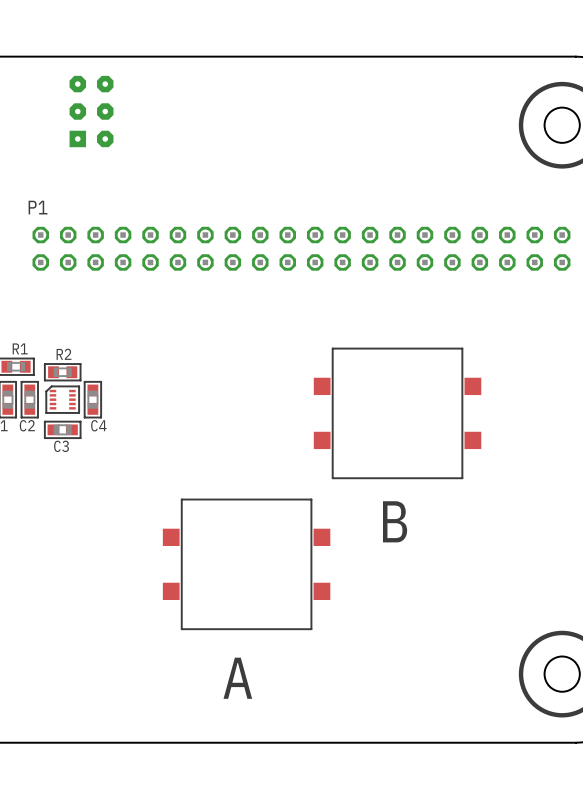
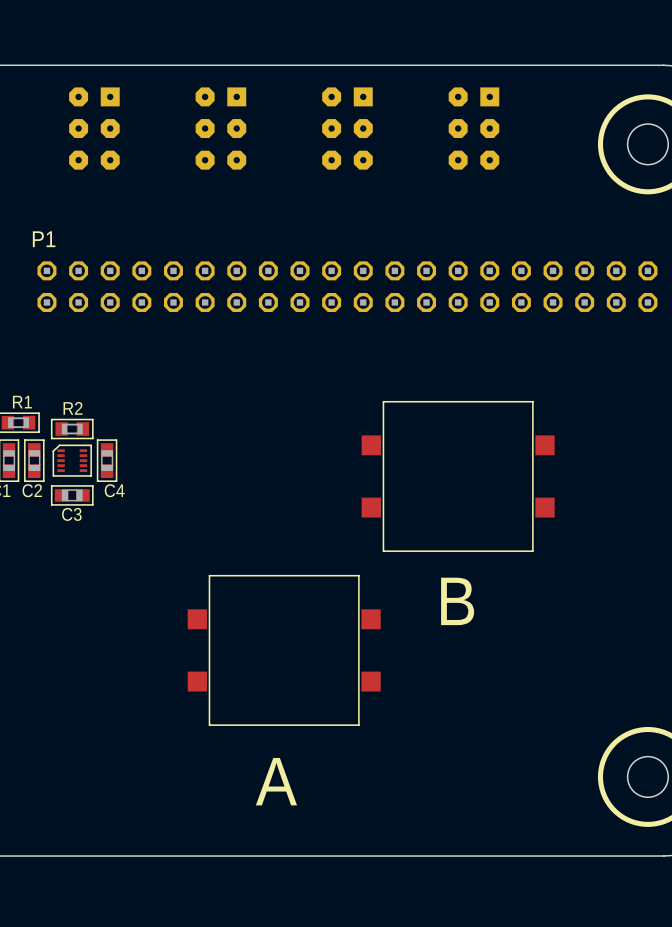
part rotation: 0° (91, 111) -> 180° (94, 128)
part: none -> (220, 128)
part: none -> (347, 128)
part: none -> (473, 128)

